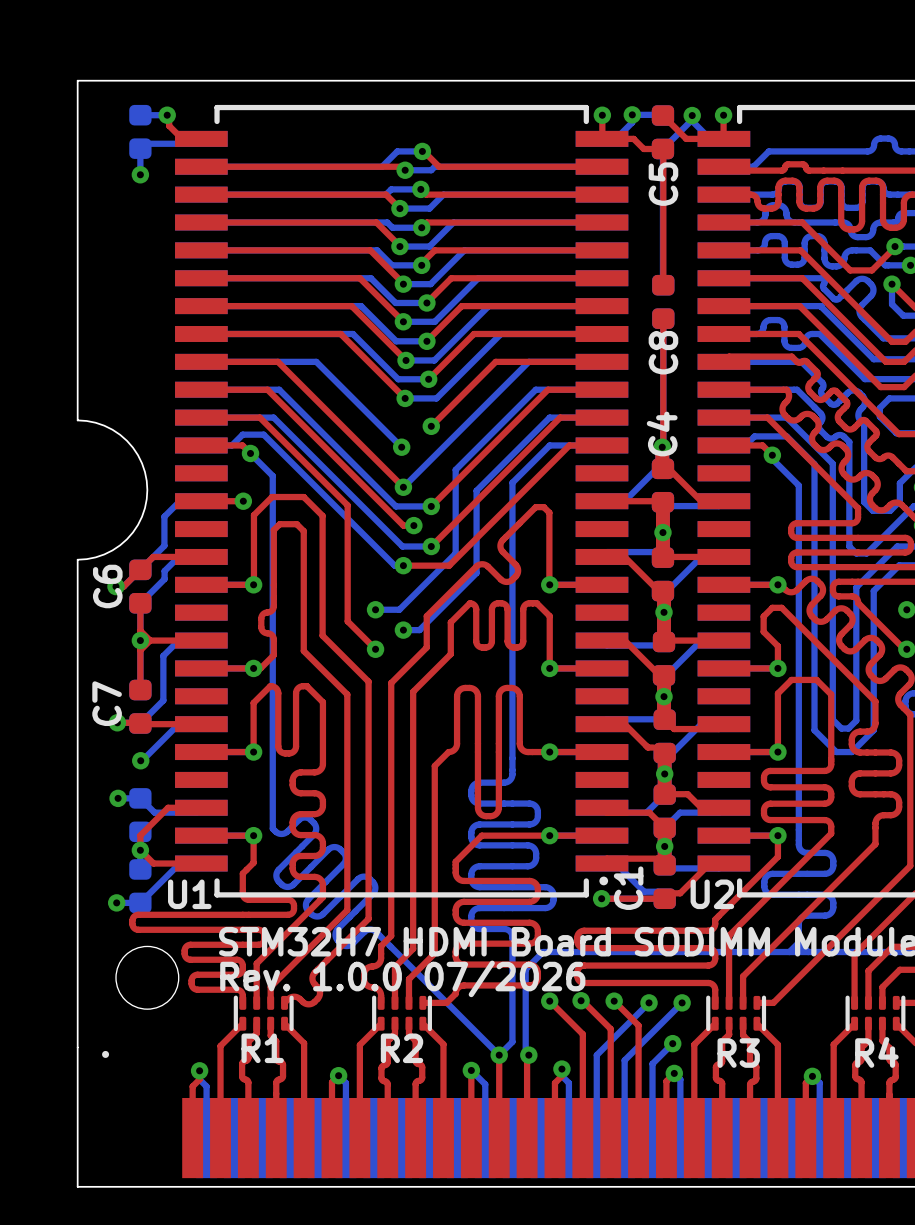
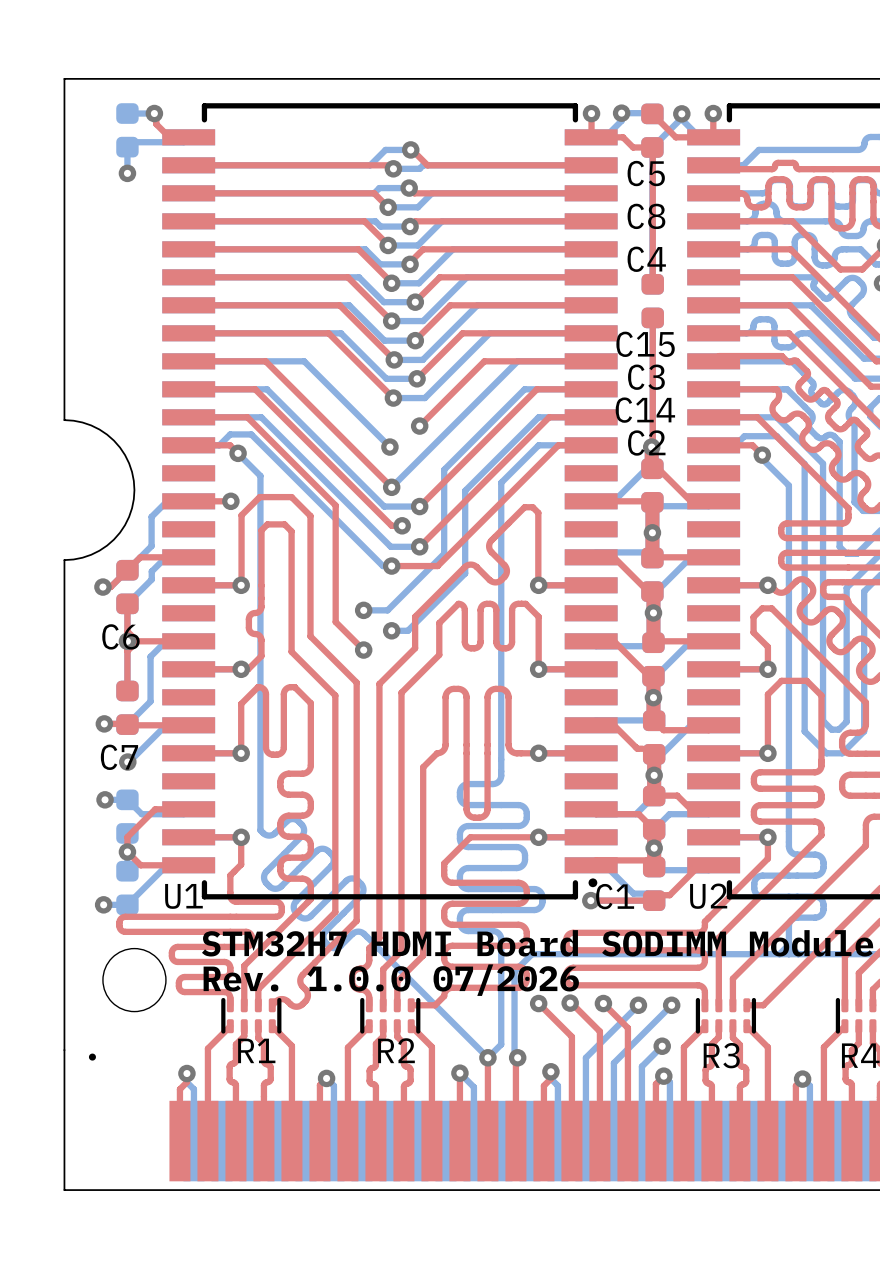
C5 name rotation: 0° (663, 184) -> 90° clockwise (646, 173)
C15 name: none -> C15 (645, 344)
C8 name rotation: 0° (663, 352) -> 90° clockwise (646, 216)
C8 name position: C8 (663, 352) -> C8 (646, 216)
C3 name: none -> C3 (646, 377)
C14 name: none -> C14 (645, 410)
C4 name rotation: 0° (662, 434) -> 90° clockwise (646, 259)
C4 name position: C4 (662, 434) -> C4 (646, 259)
C2 name: none -> C2 (646, 443)
C6 name rotation: 0° (107, 586) -> 90° clockwise (120, 636)
C6 name position: C6 (107, 586) -> C6 (120, 636)
C7 name rotation: 0° (107, 703) -> 90° clockwise (119, 757)
C7 name position: C7 (107, 703) -> C7 (119, 757)
C1 name rotation: 0° (628, 888) -> 90° clockwise (615, 896)

